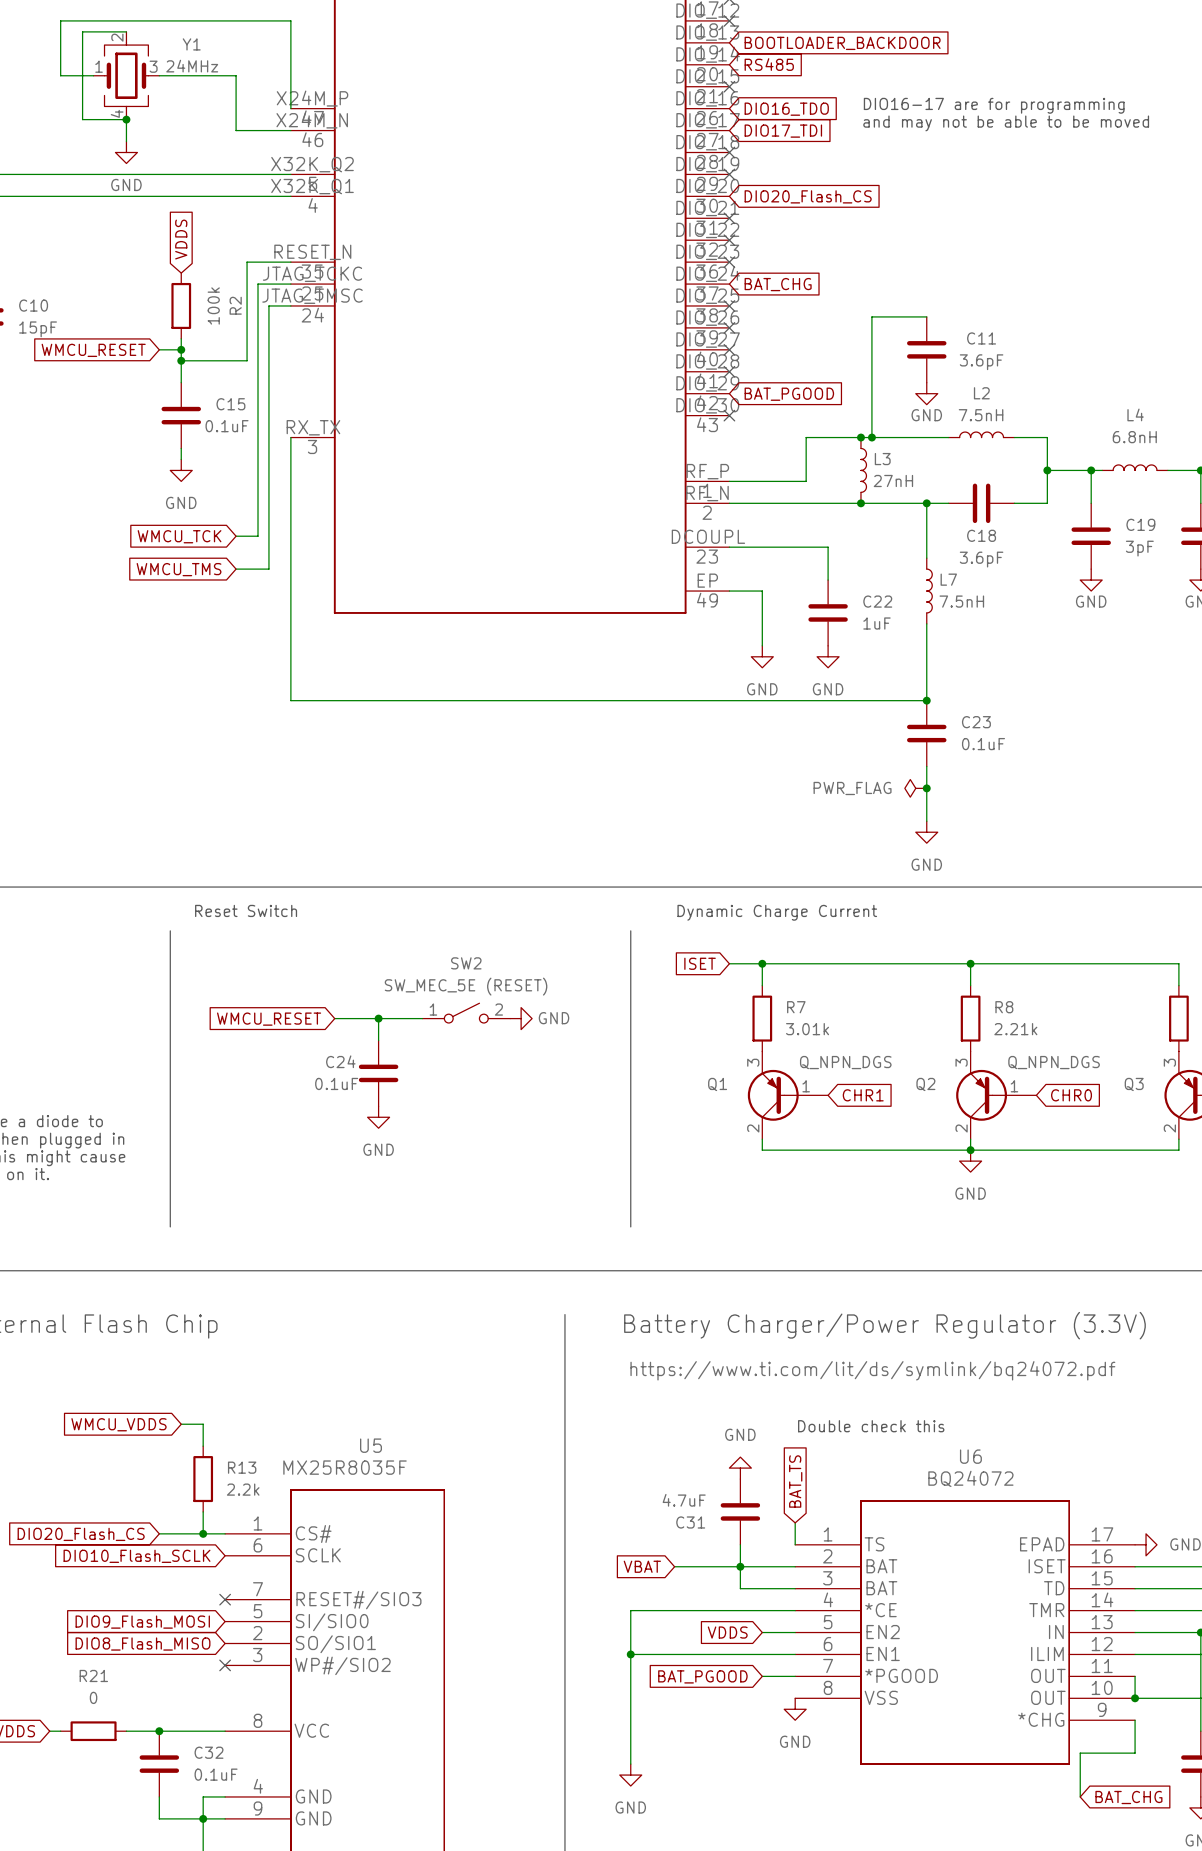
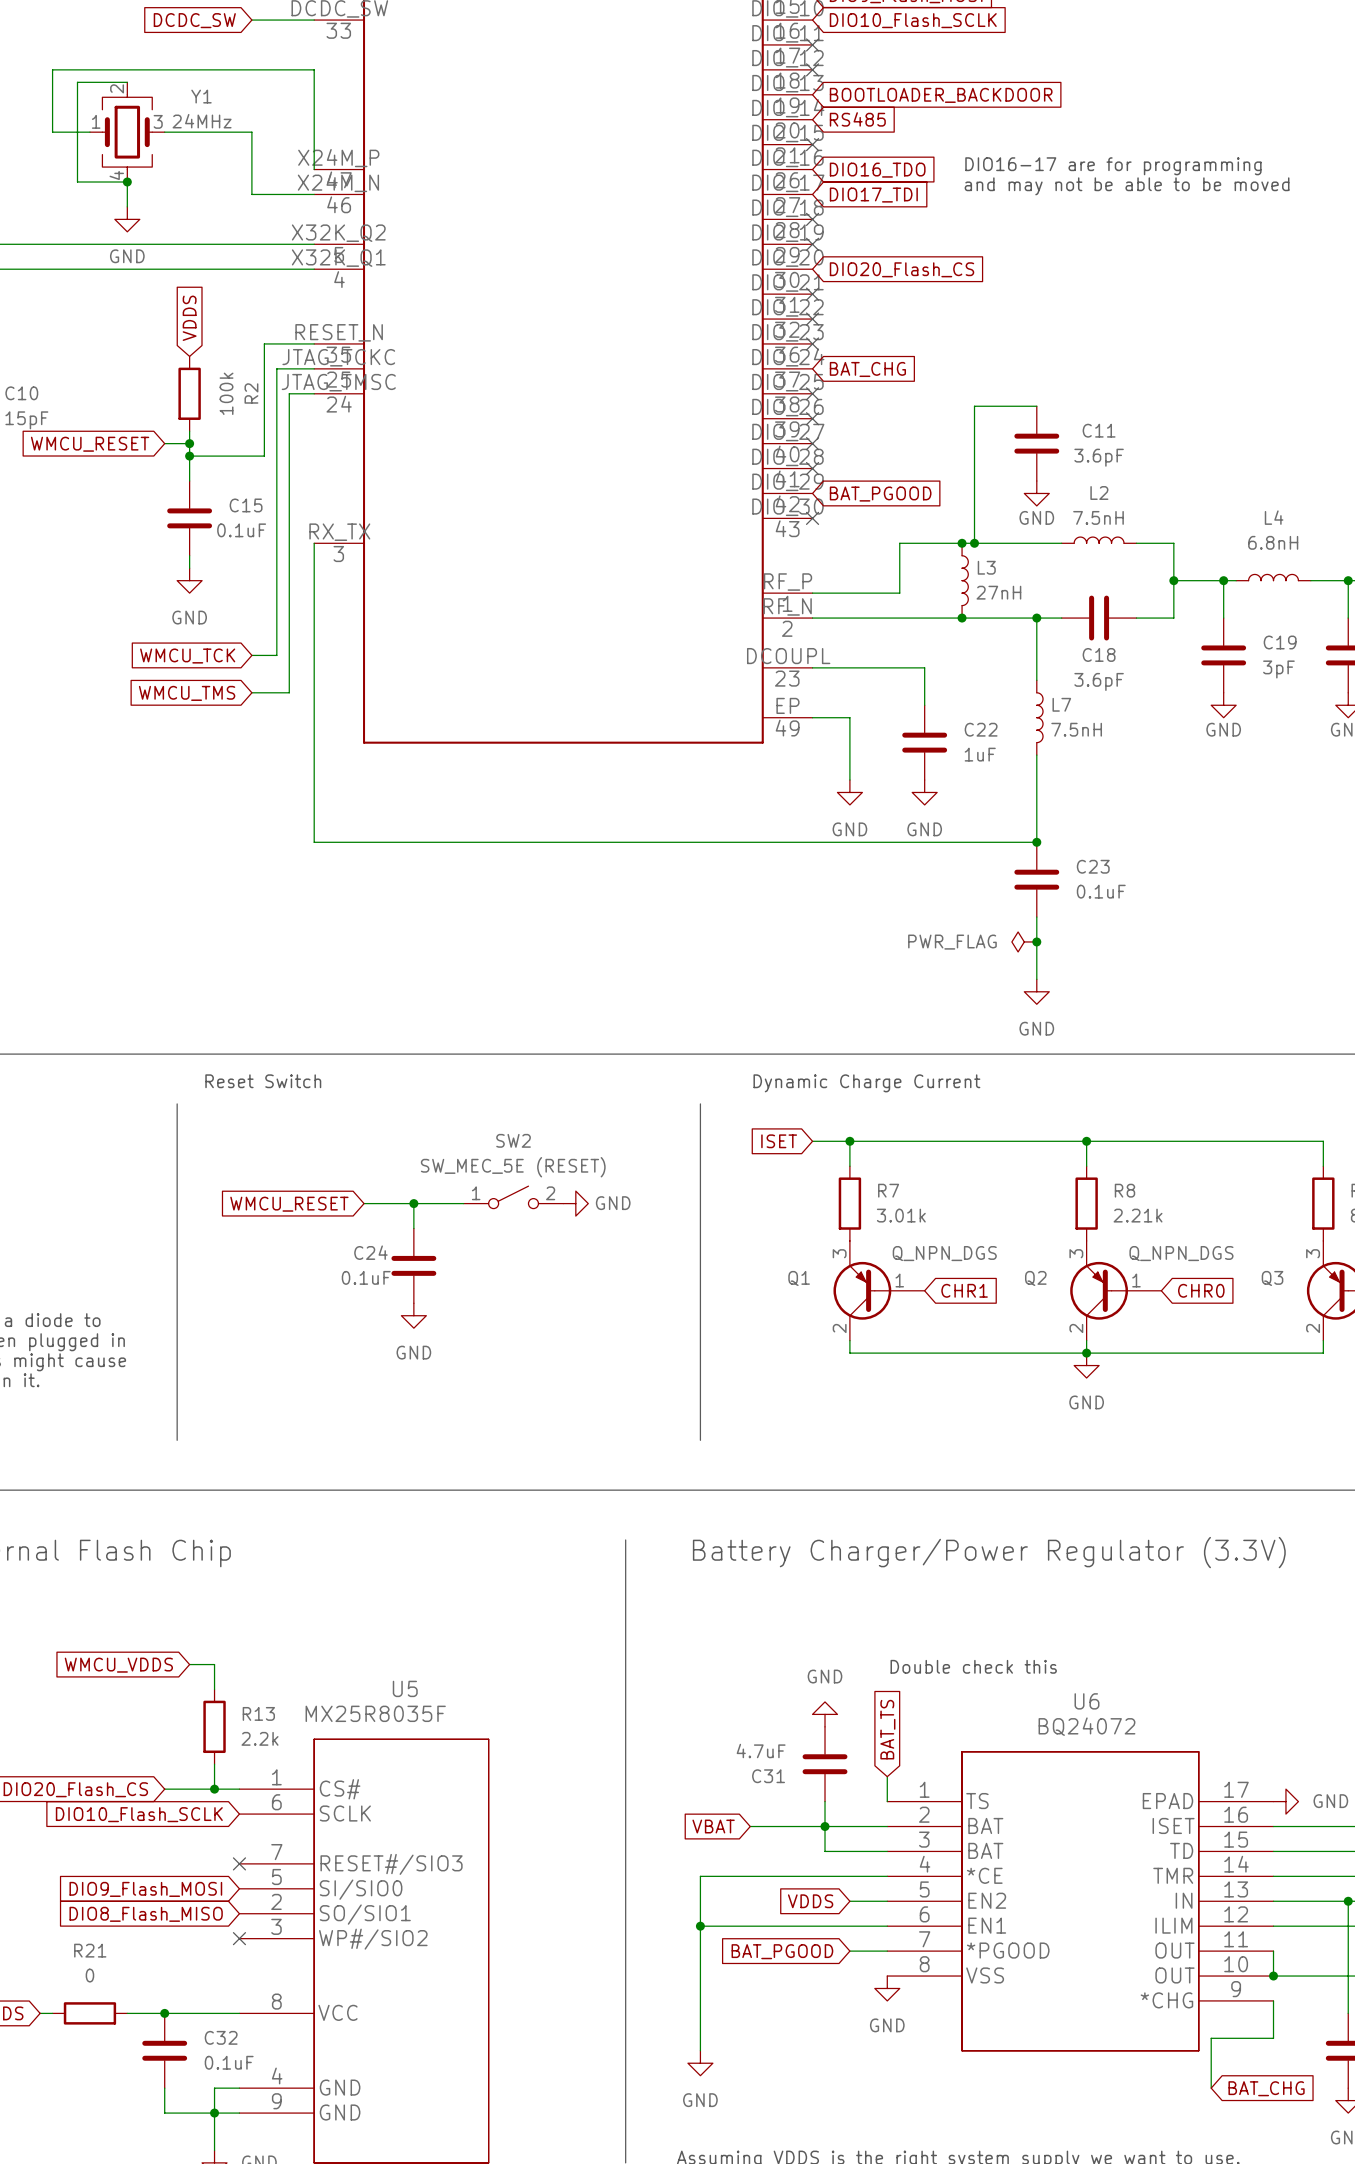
U6 text: https://www.ti.com/lit/ds/symlink/bq24072.pdf (872, 1370) -> none

